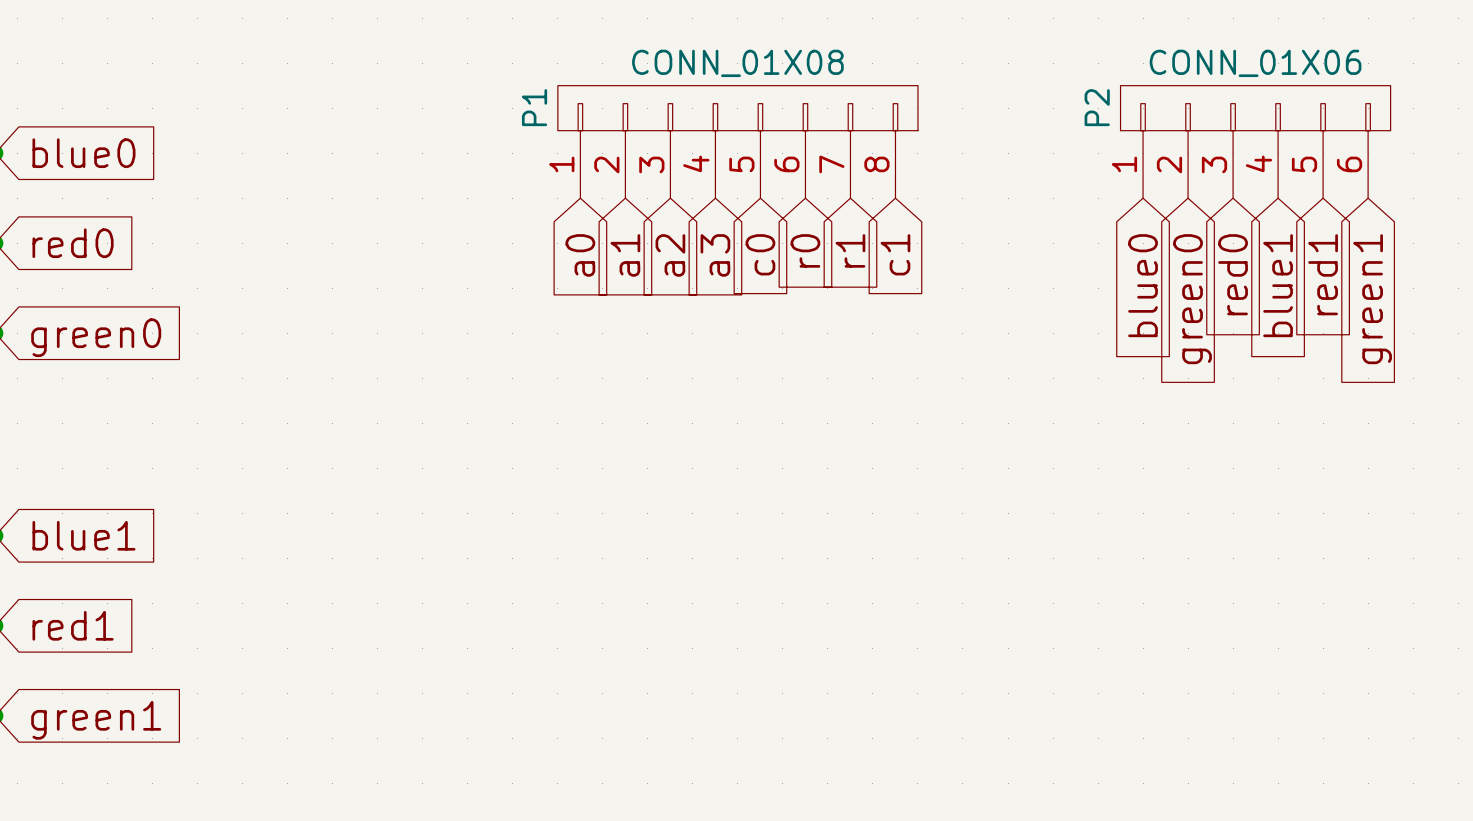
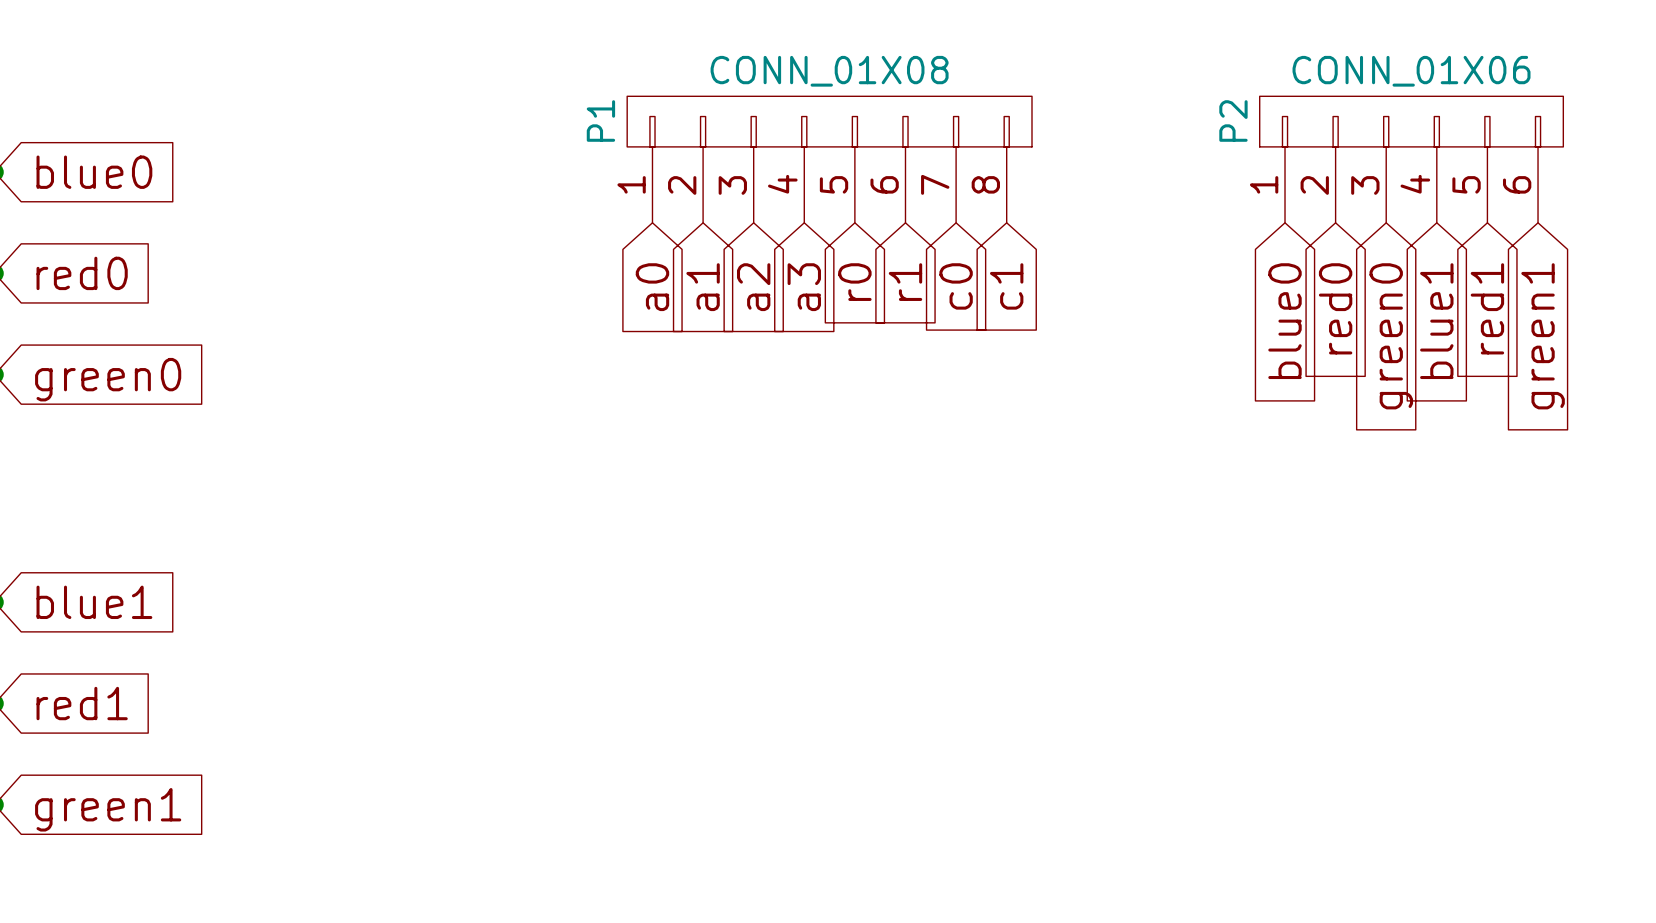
global label: r0 (805, 250) -> r1 (905, 282)
global label: r1 (850, 250) -> c0 (956, 286)
global label: c0 (760, 254) -> r0 (854, 282)
global label: red0 (1233, 274) -> green0 (1391, 336)
global label: green0 (1192, 299) -> red0 (1335, 308)

